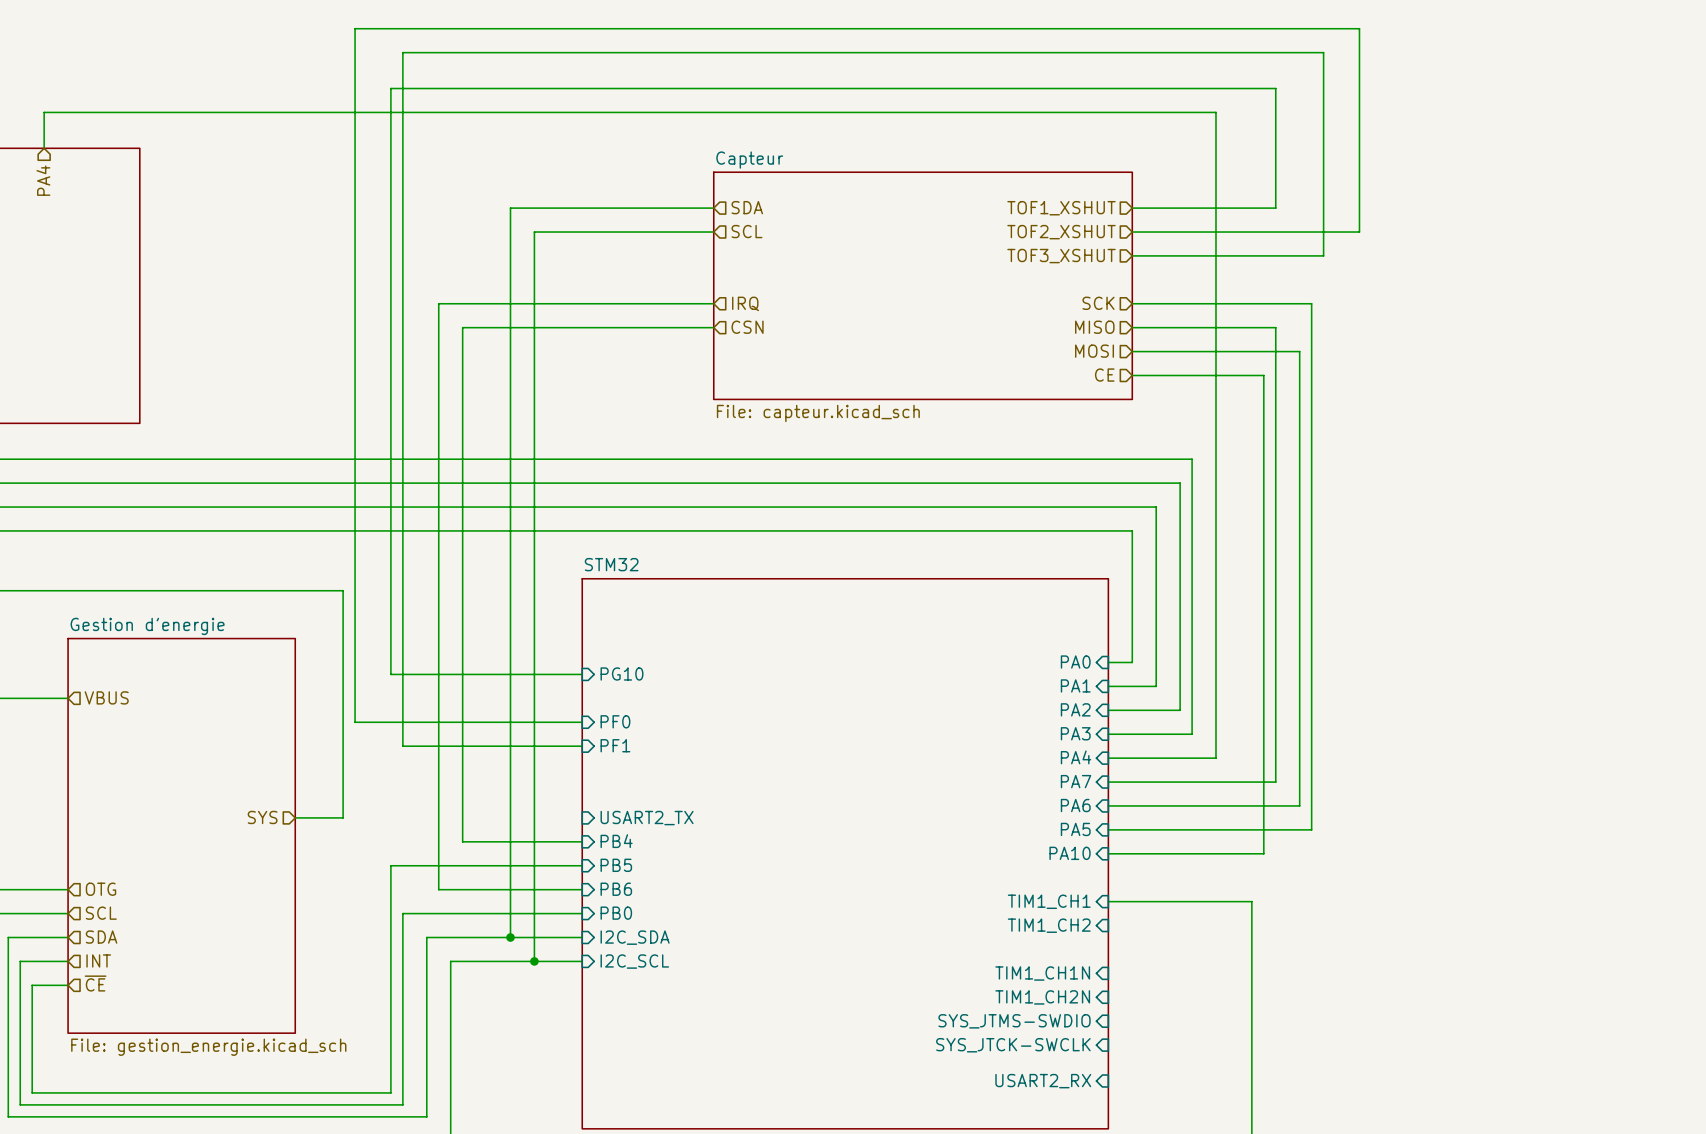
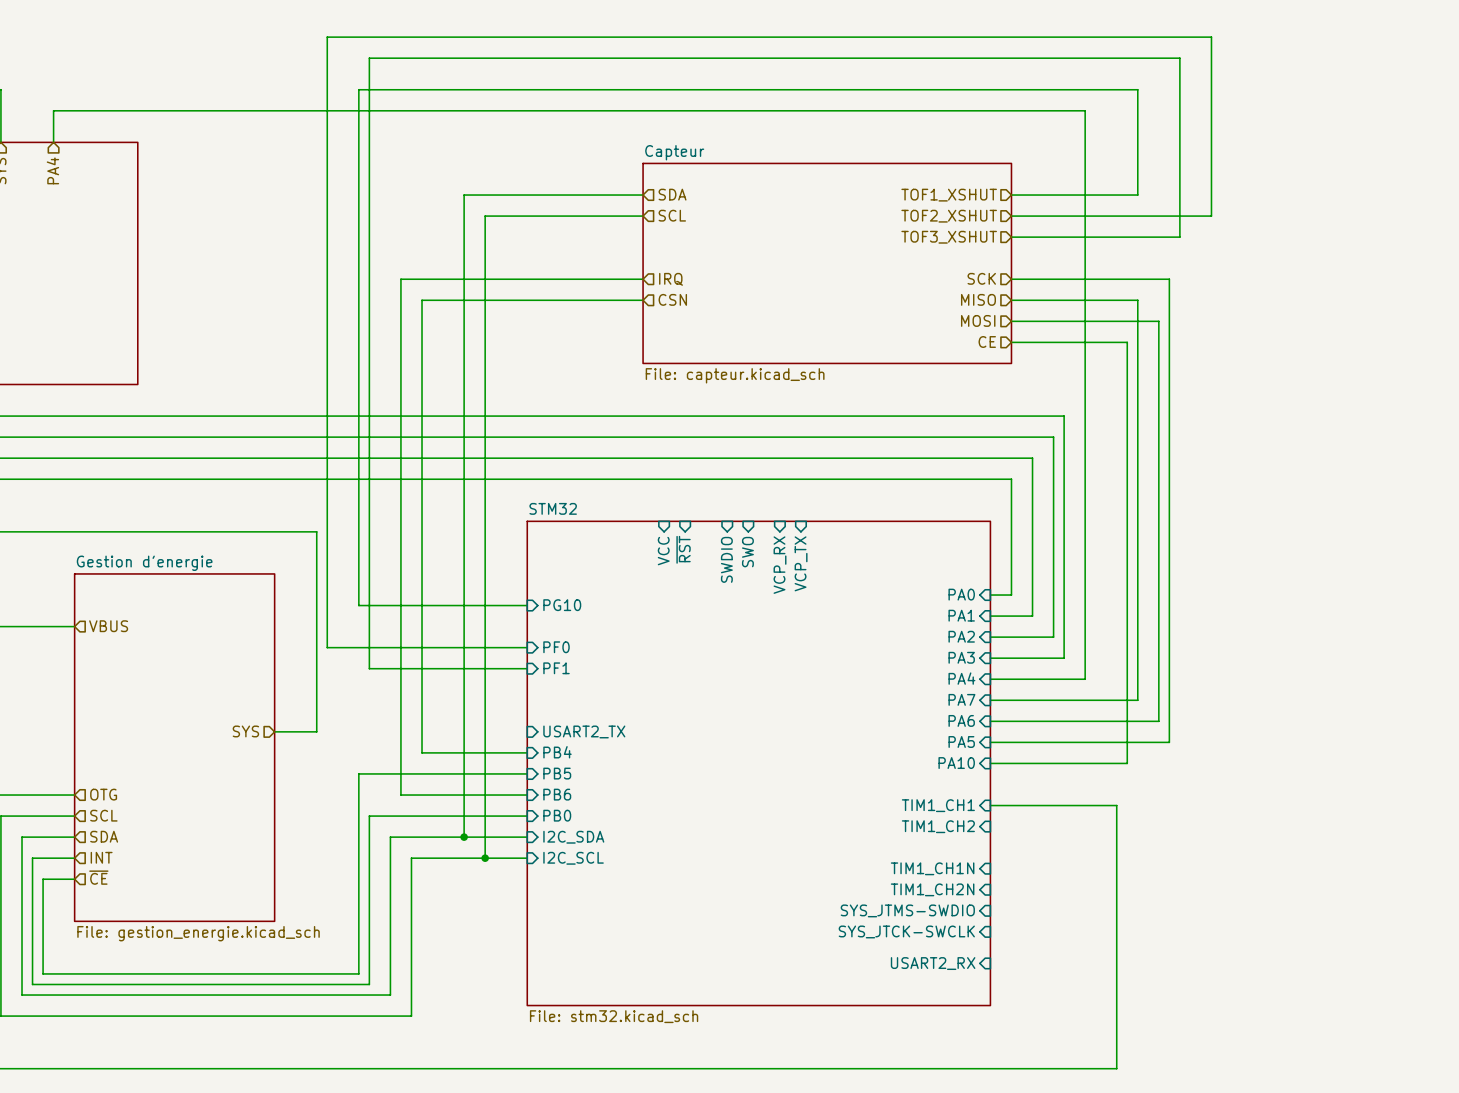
sheet pin: none -> ~{RST} (683, 549)
sheet pin: none -> VCC (663, 551)
sheet pin: none -> SWO (747, 552)
sheet pin: none -> SWDIO (726, 559)
sheet pin: none -> VCP_TX (801, 563)
sheet pin: none -> VCP_RX (780, 565)

